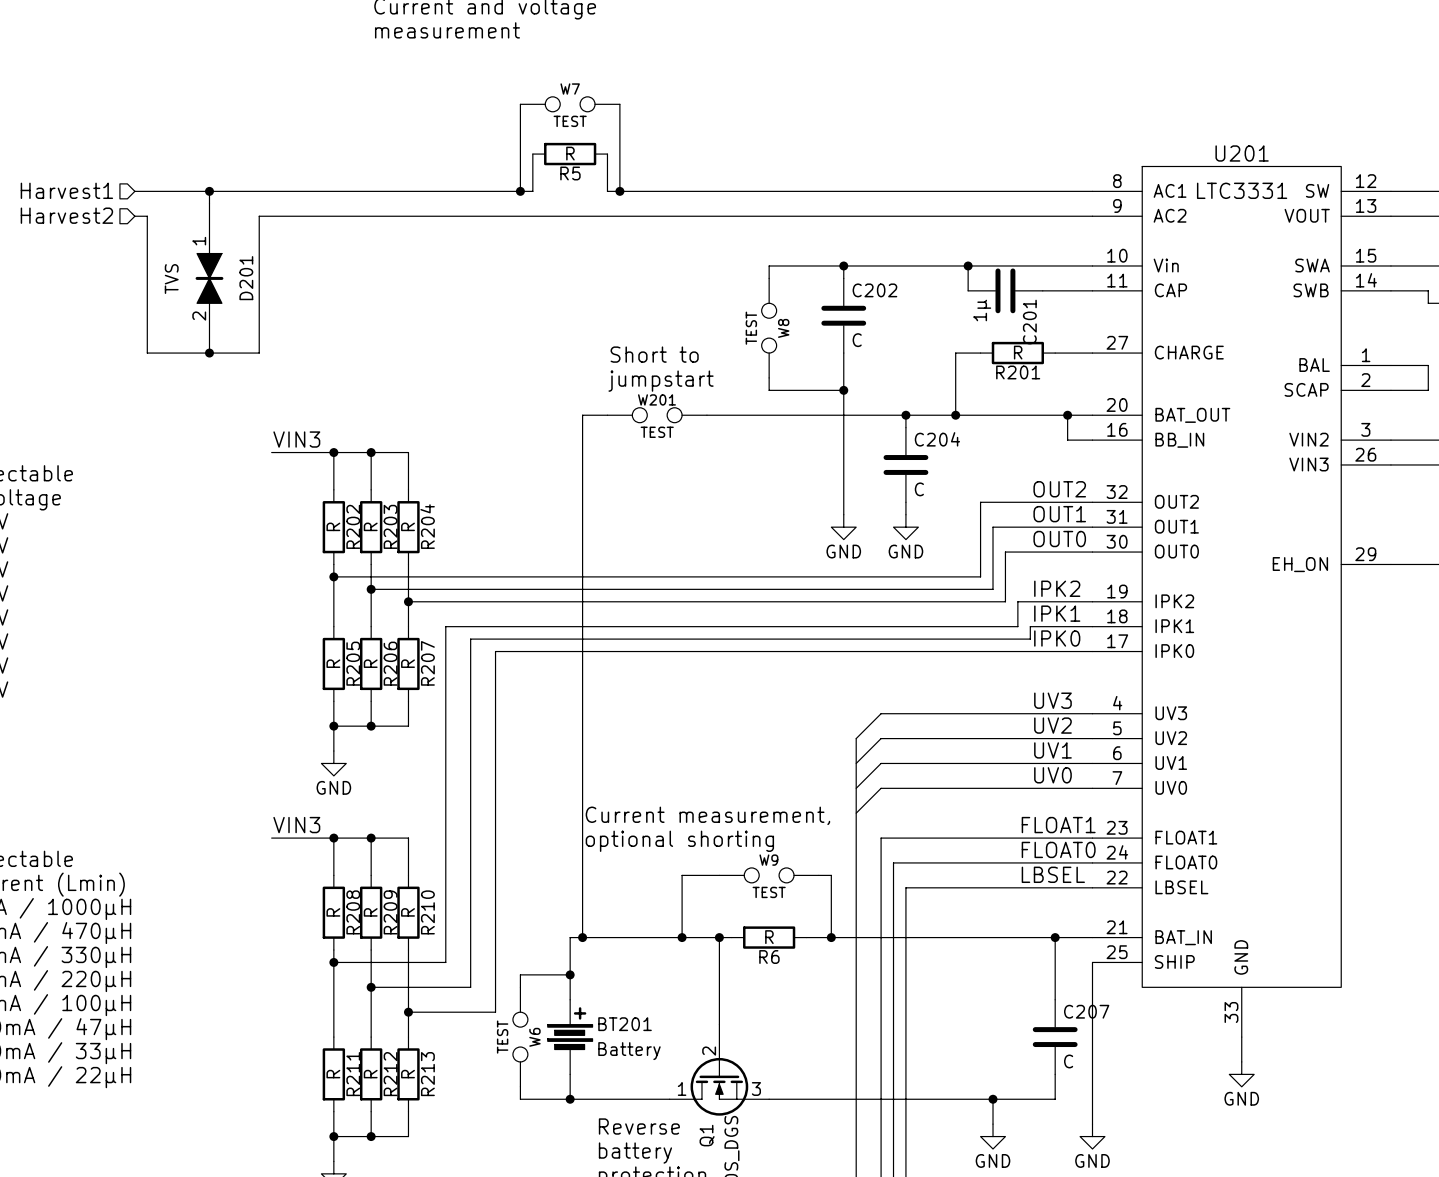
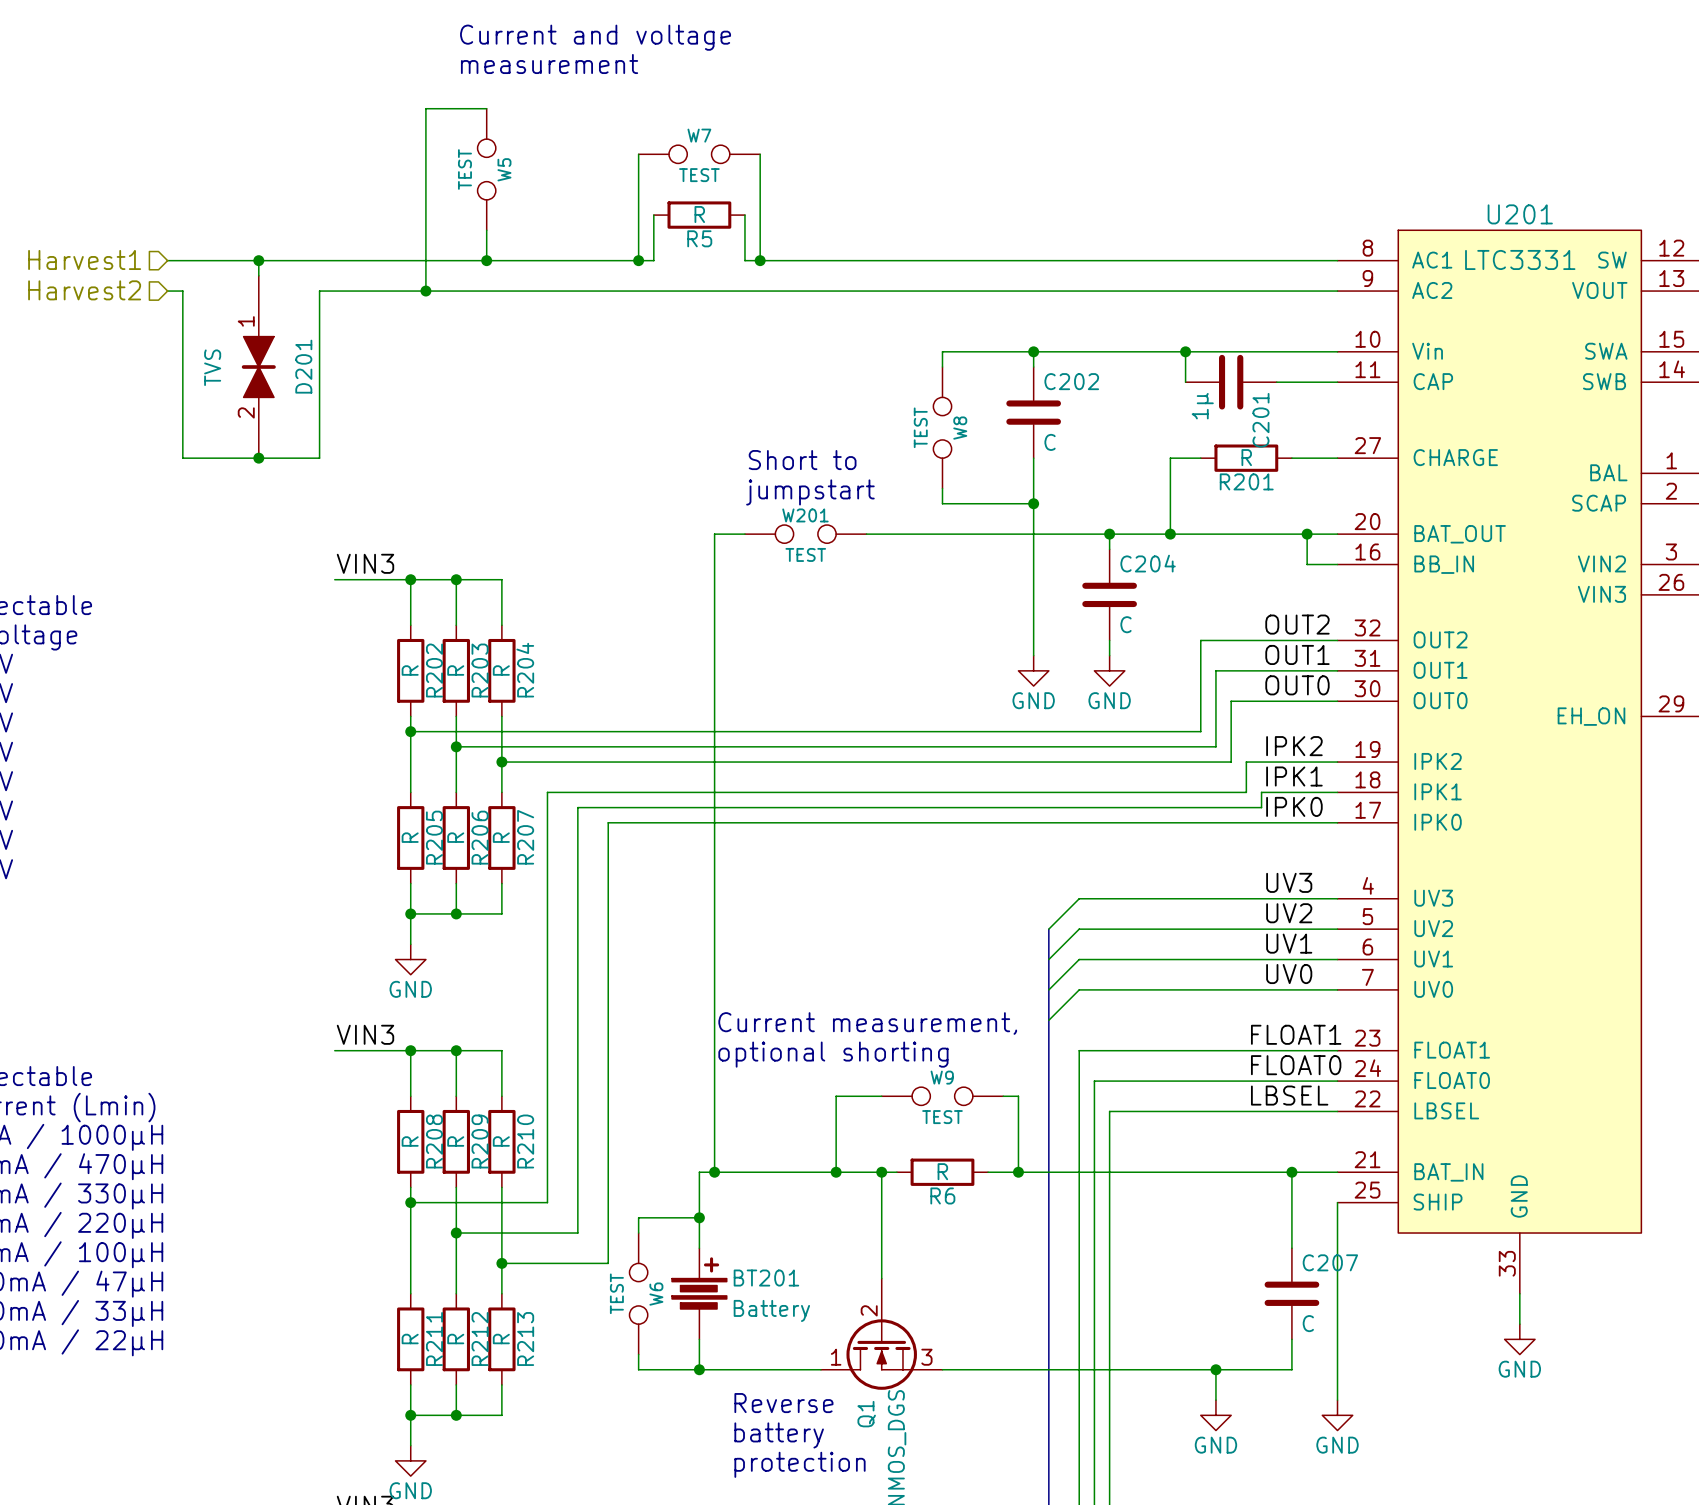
wire: none -> (486, 108) (425, 108) (425, 291)
W5: none -> TEST (486, 169)
wire: none -> (486, 230) (486, 260)
junction: none -> (486, 260)
junction: none -> (425, 291)

